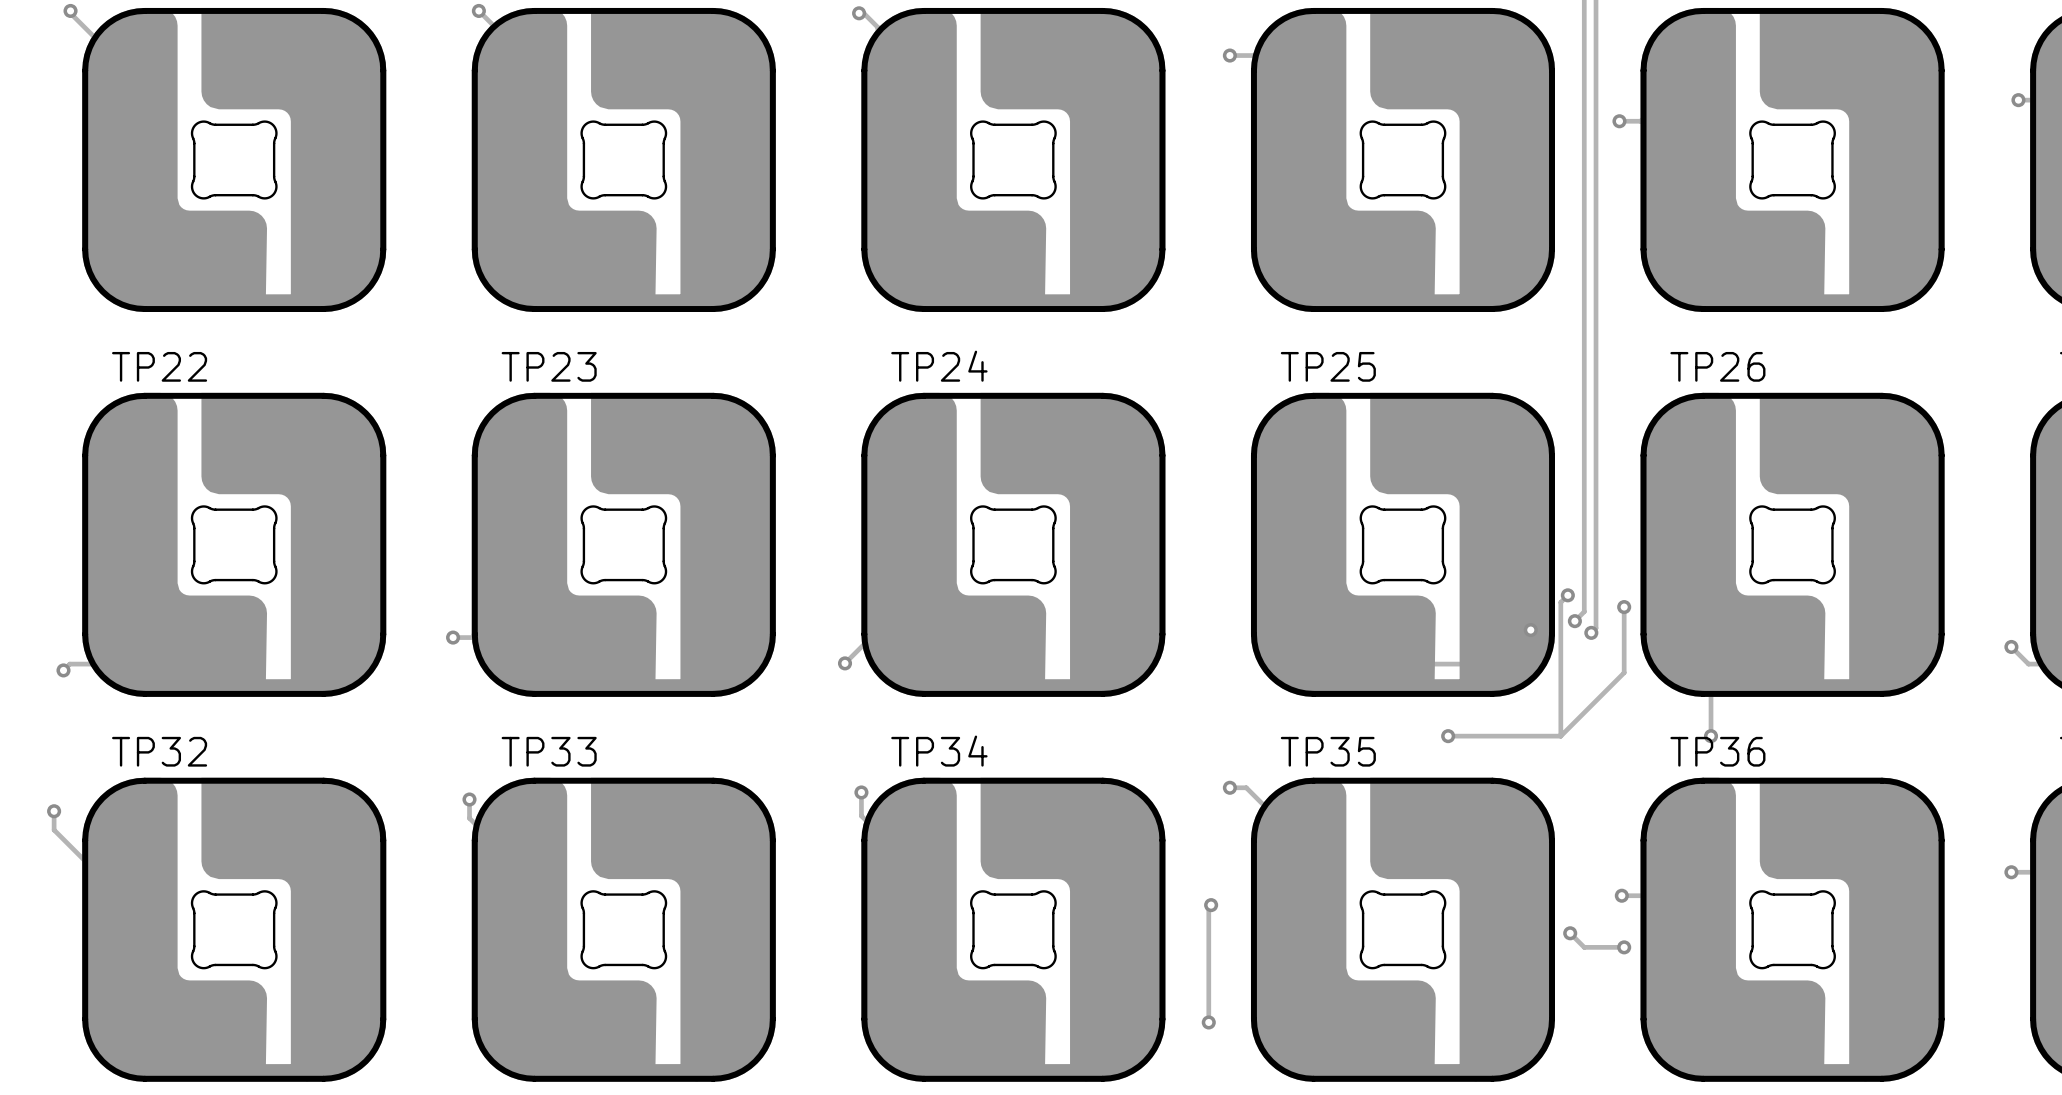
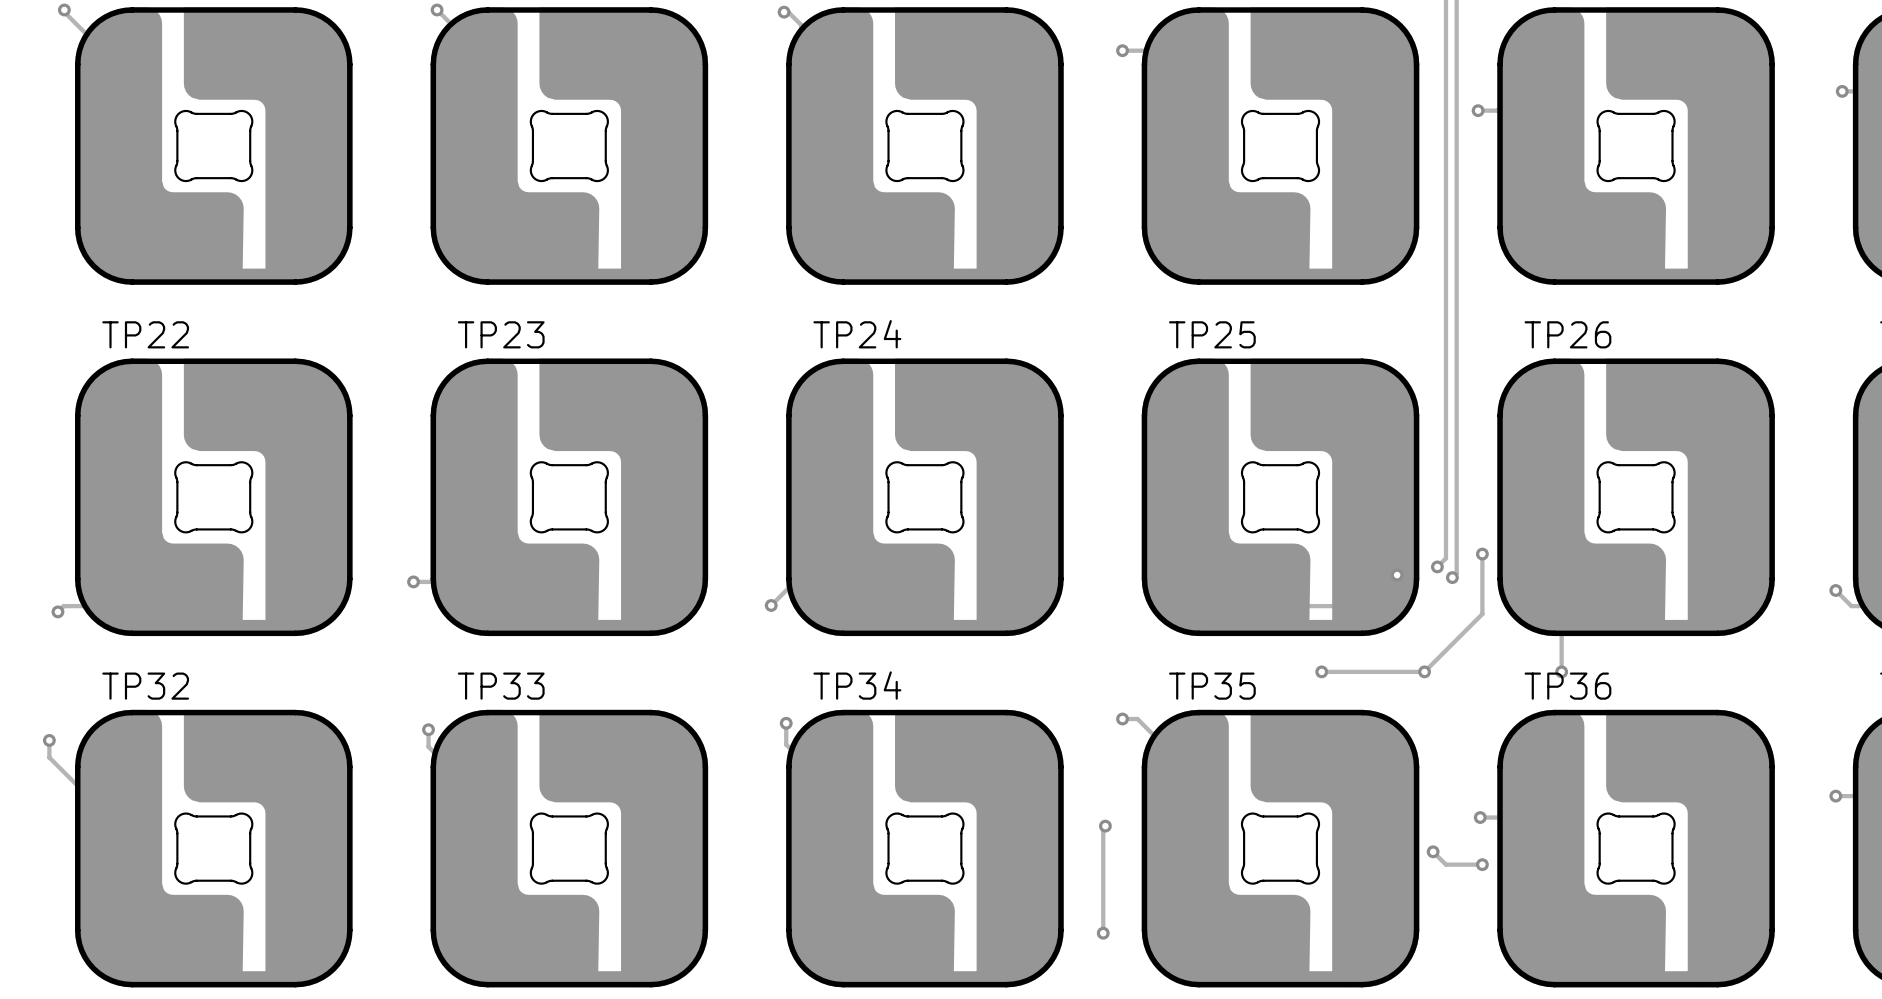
track: (1567, 595) (1560, 602) (1560, 736) -> none
via: (1567, 595) -> none
via: none -> (1424, 671)

